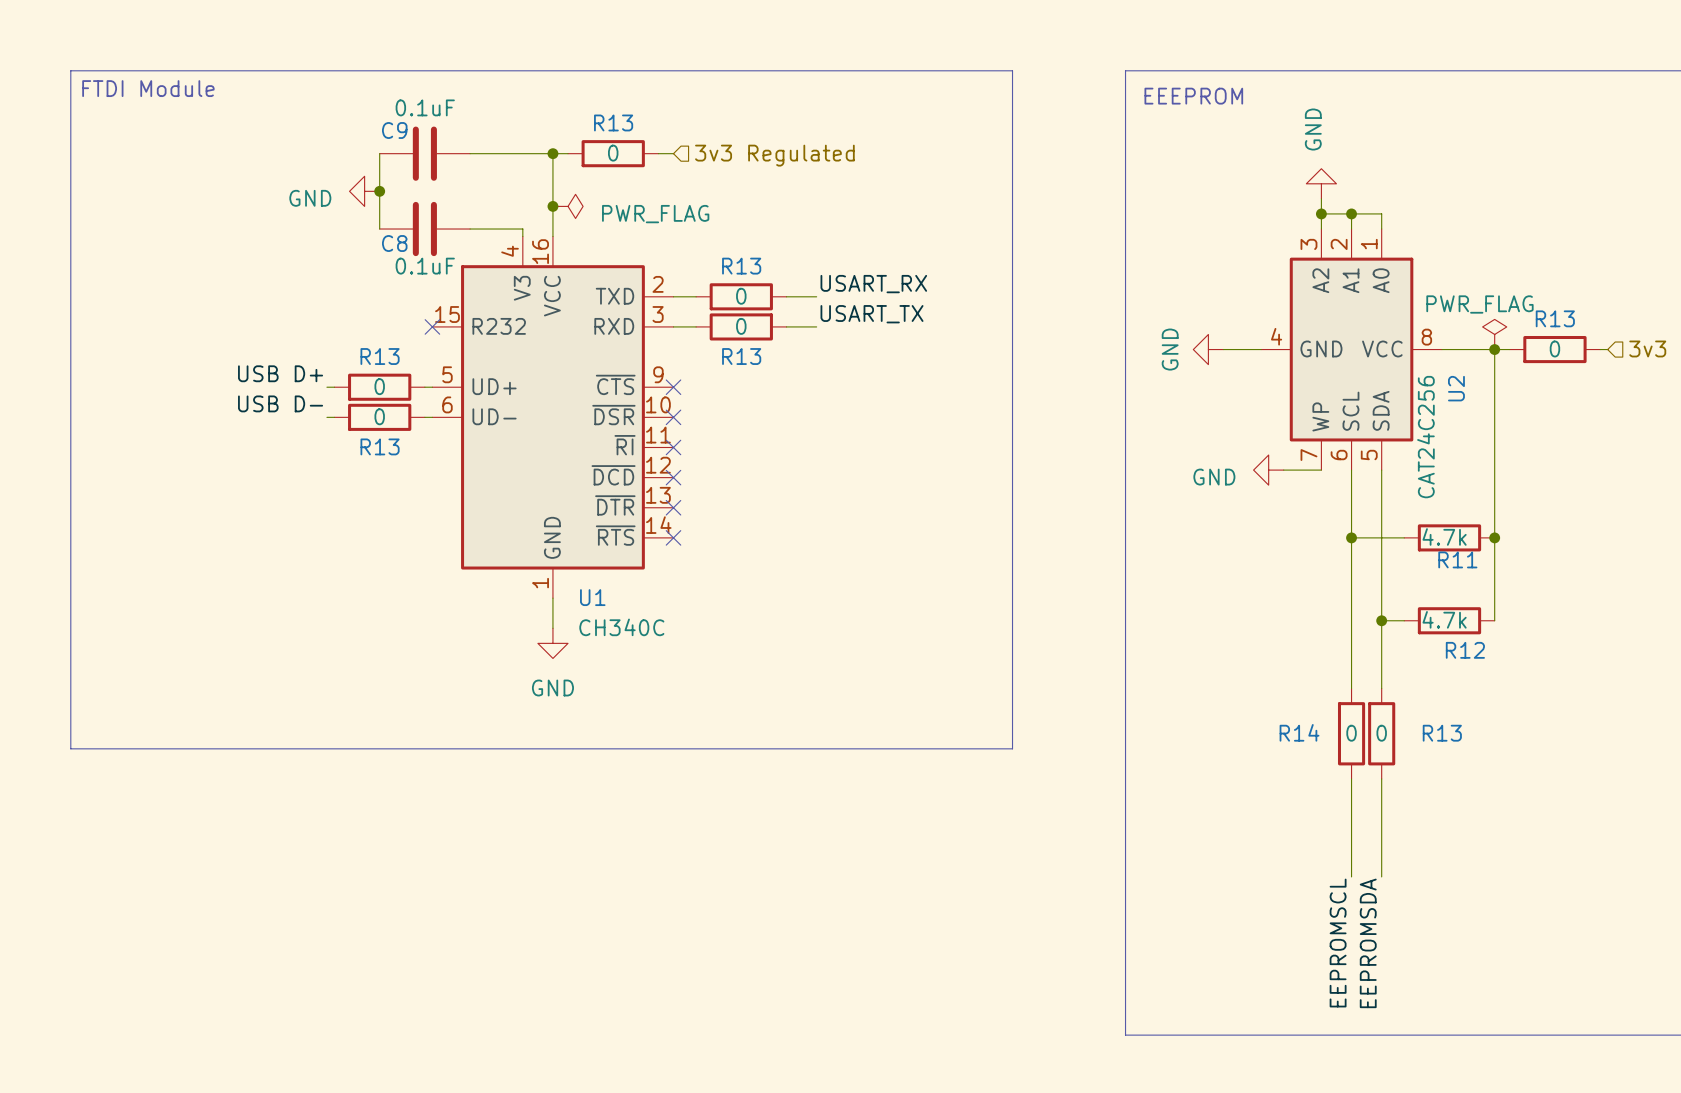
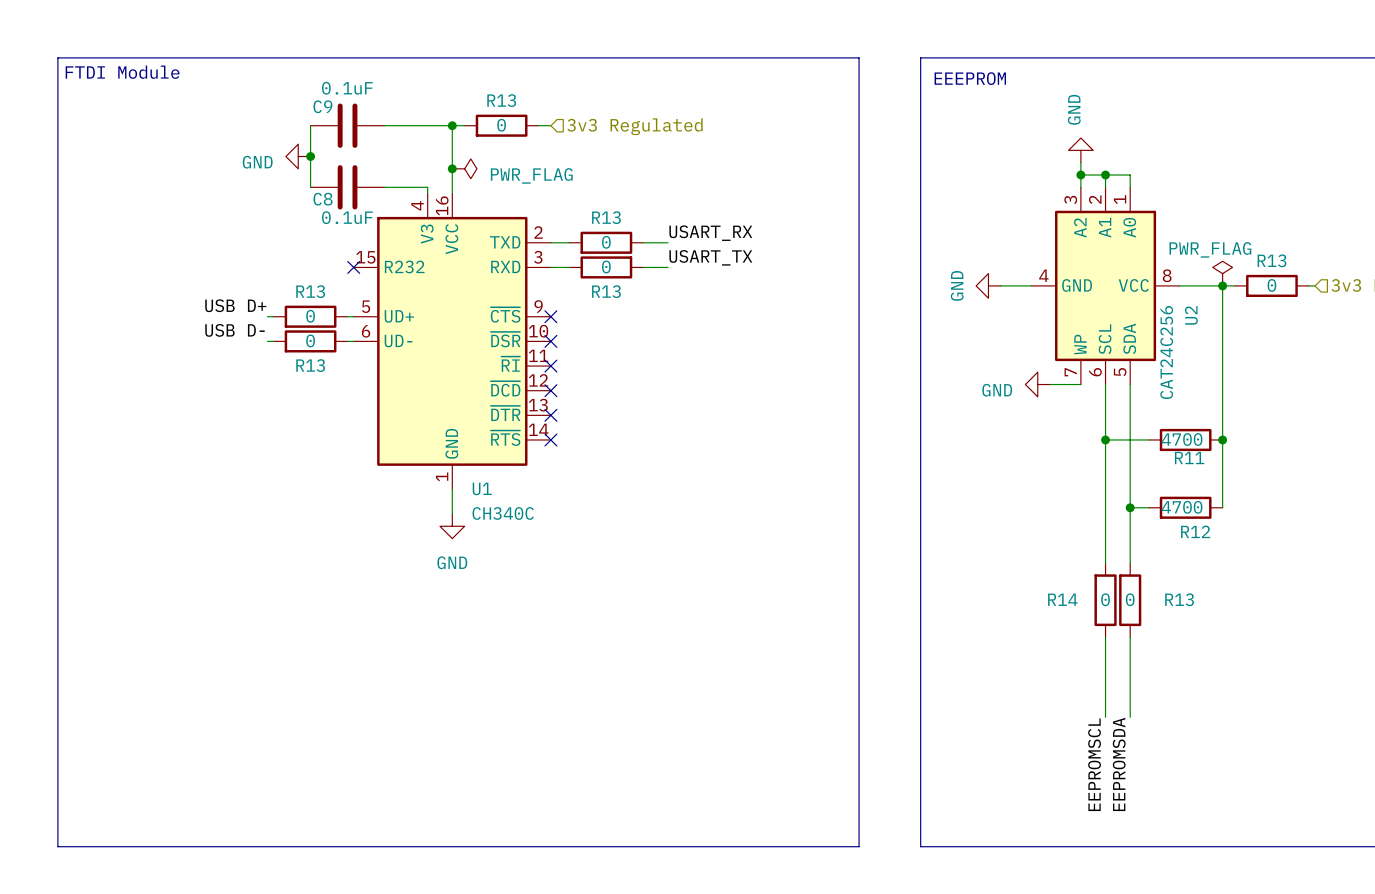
line: (1012, 70) (1012, 748) (70, 748) -> (828, 57) (859, 57) (859, 846) (57, 846) (57, 612)
R11 value: 4.7k (1444, 536) -> 4700 (1182, 439)
R12 value: 4.7k (1444, 619) -> 4700 (1182, 507)

